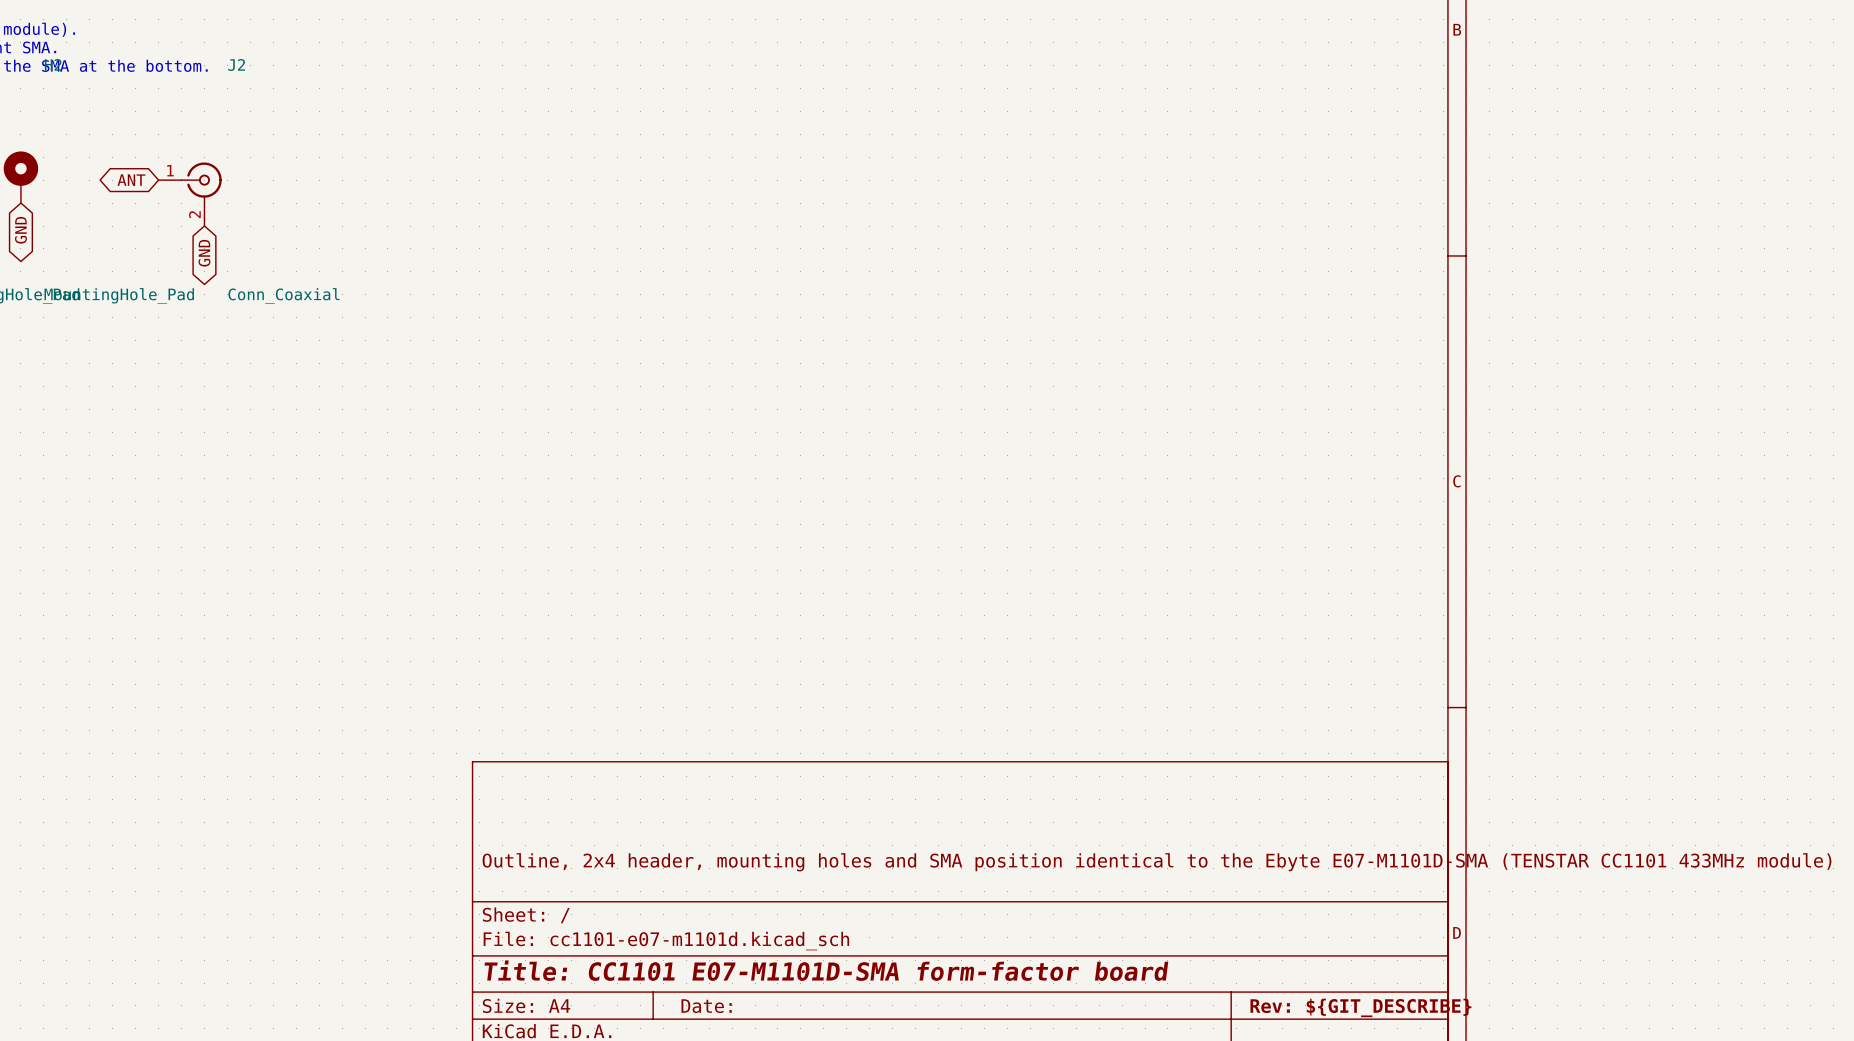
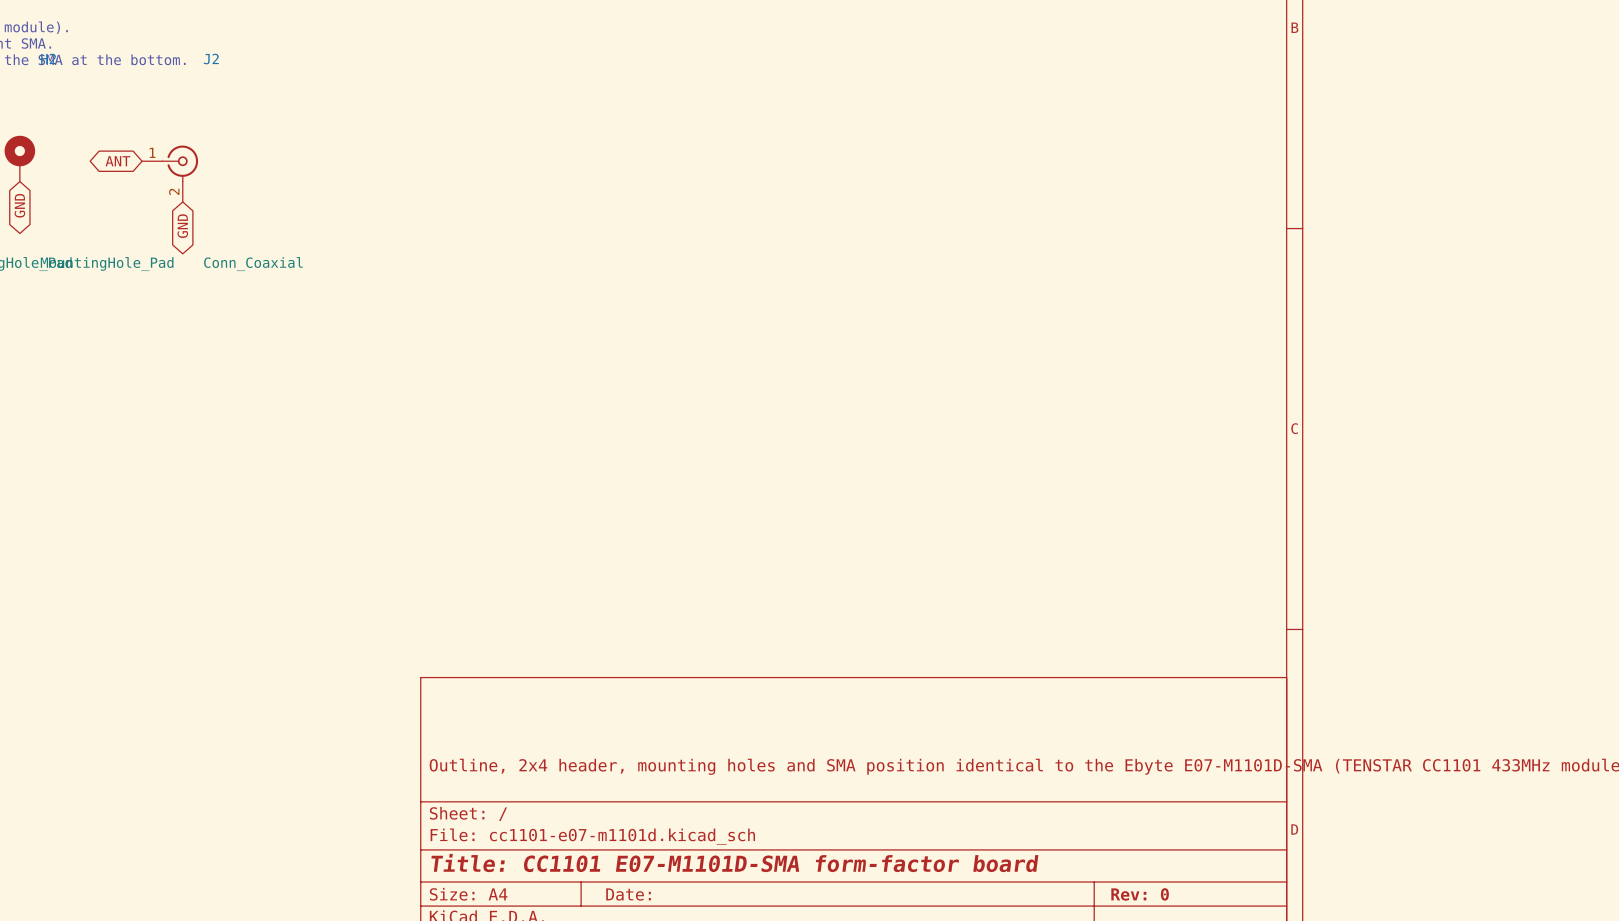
title block: Rev: ${GIT_DESCRIBE} (1360, 1007) -> Rev: 0 (1140, 894)

